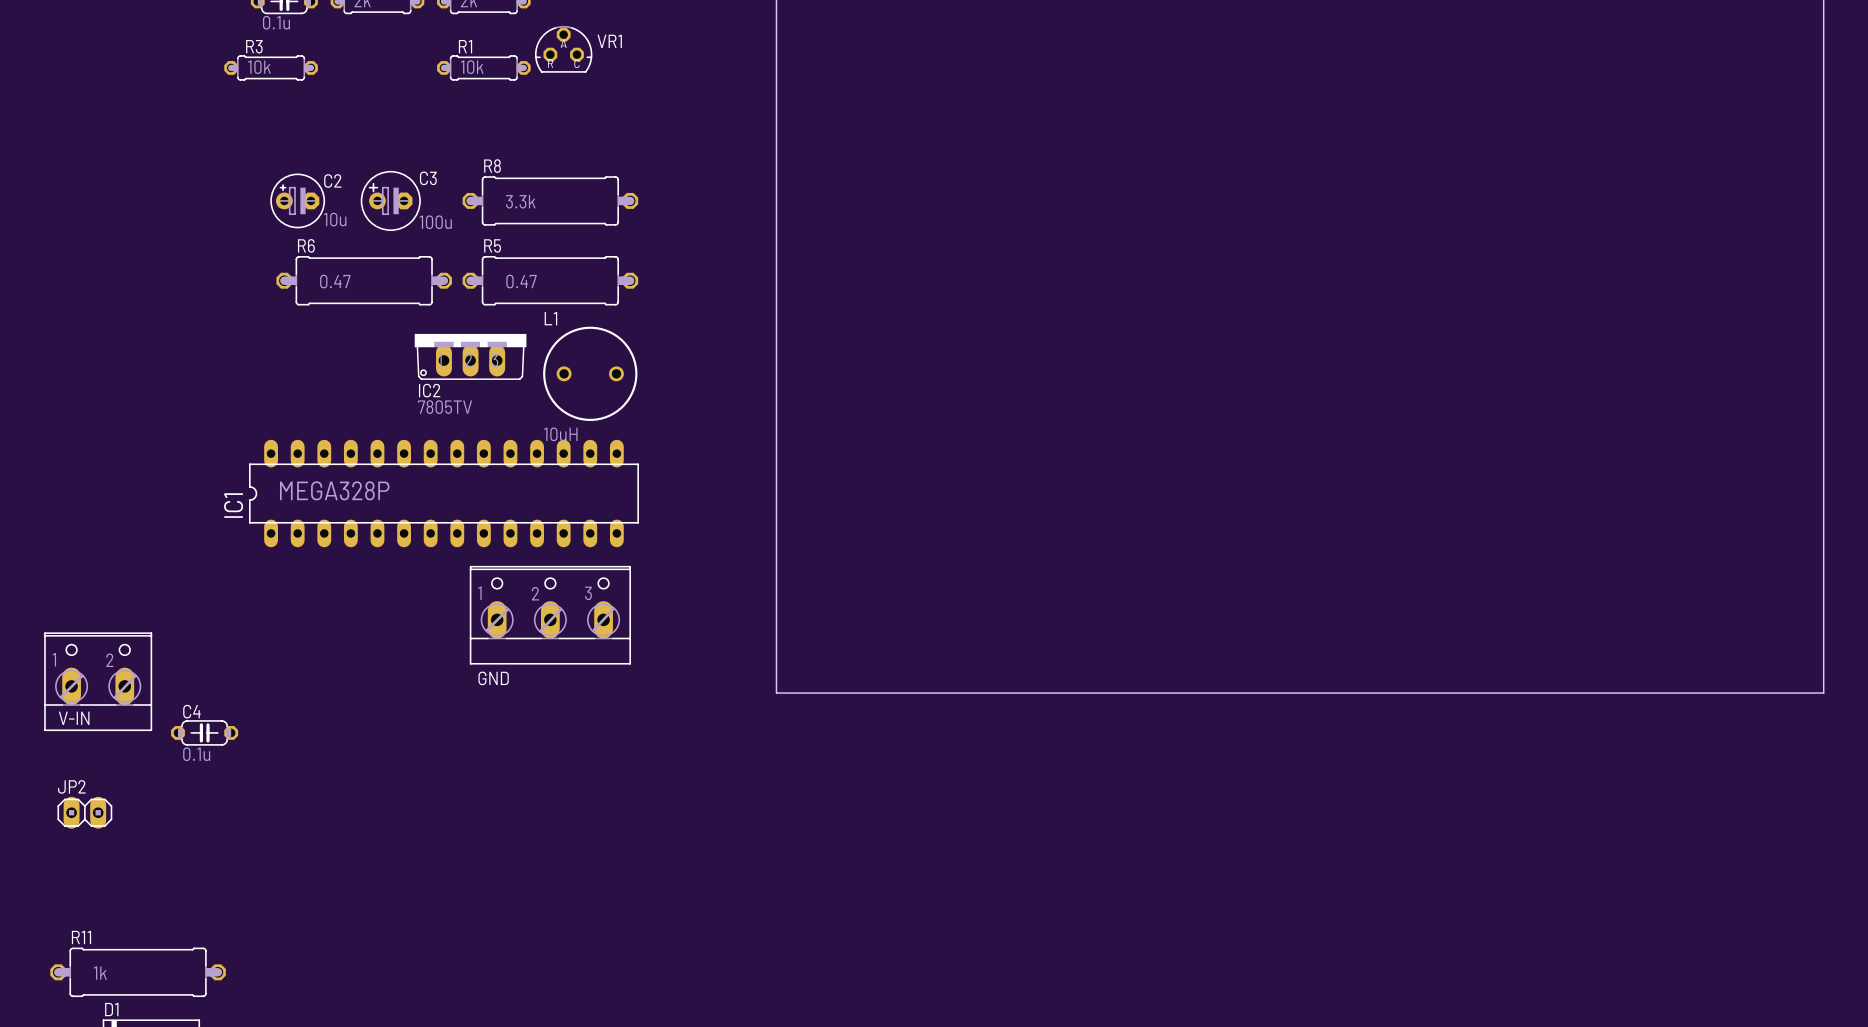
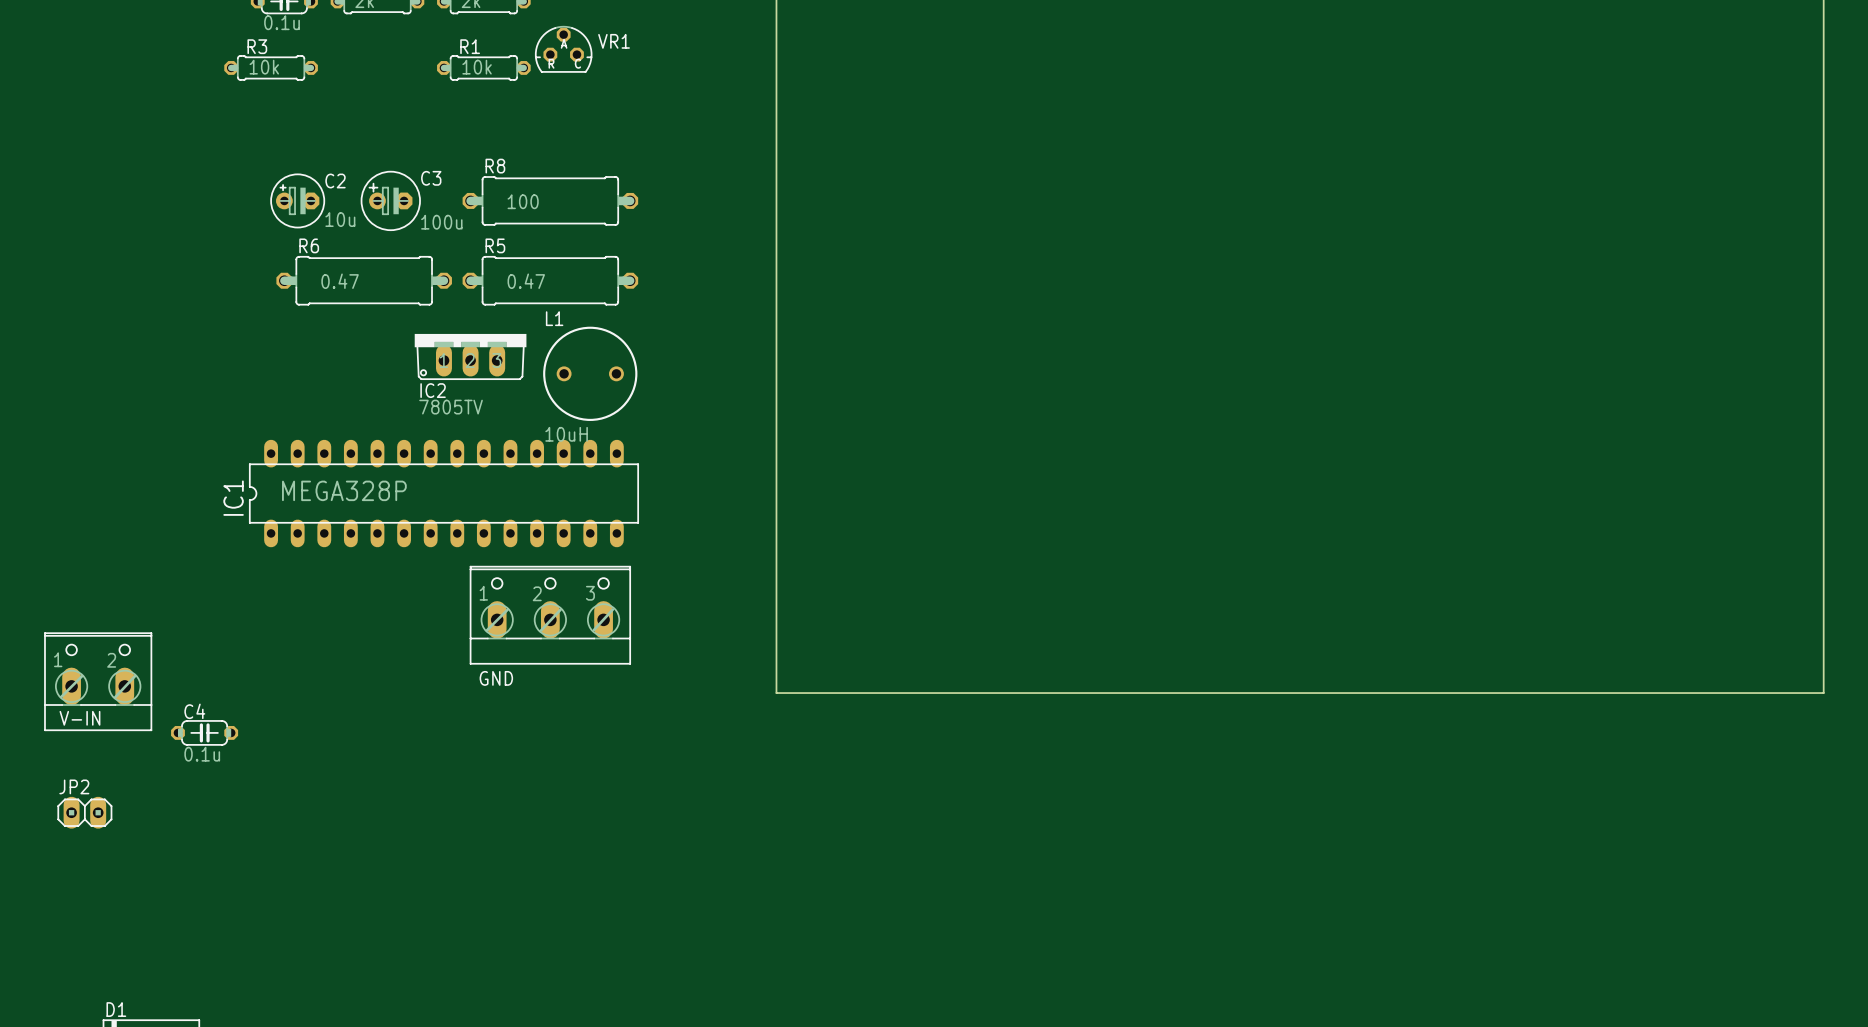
R8 value: 3.3k (520, 201) -> 100 (523, 201)
R11: 1k (138, 972) -> none

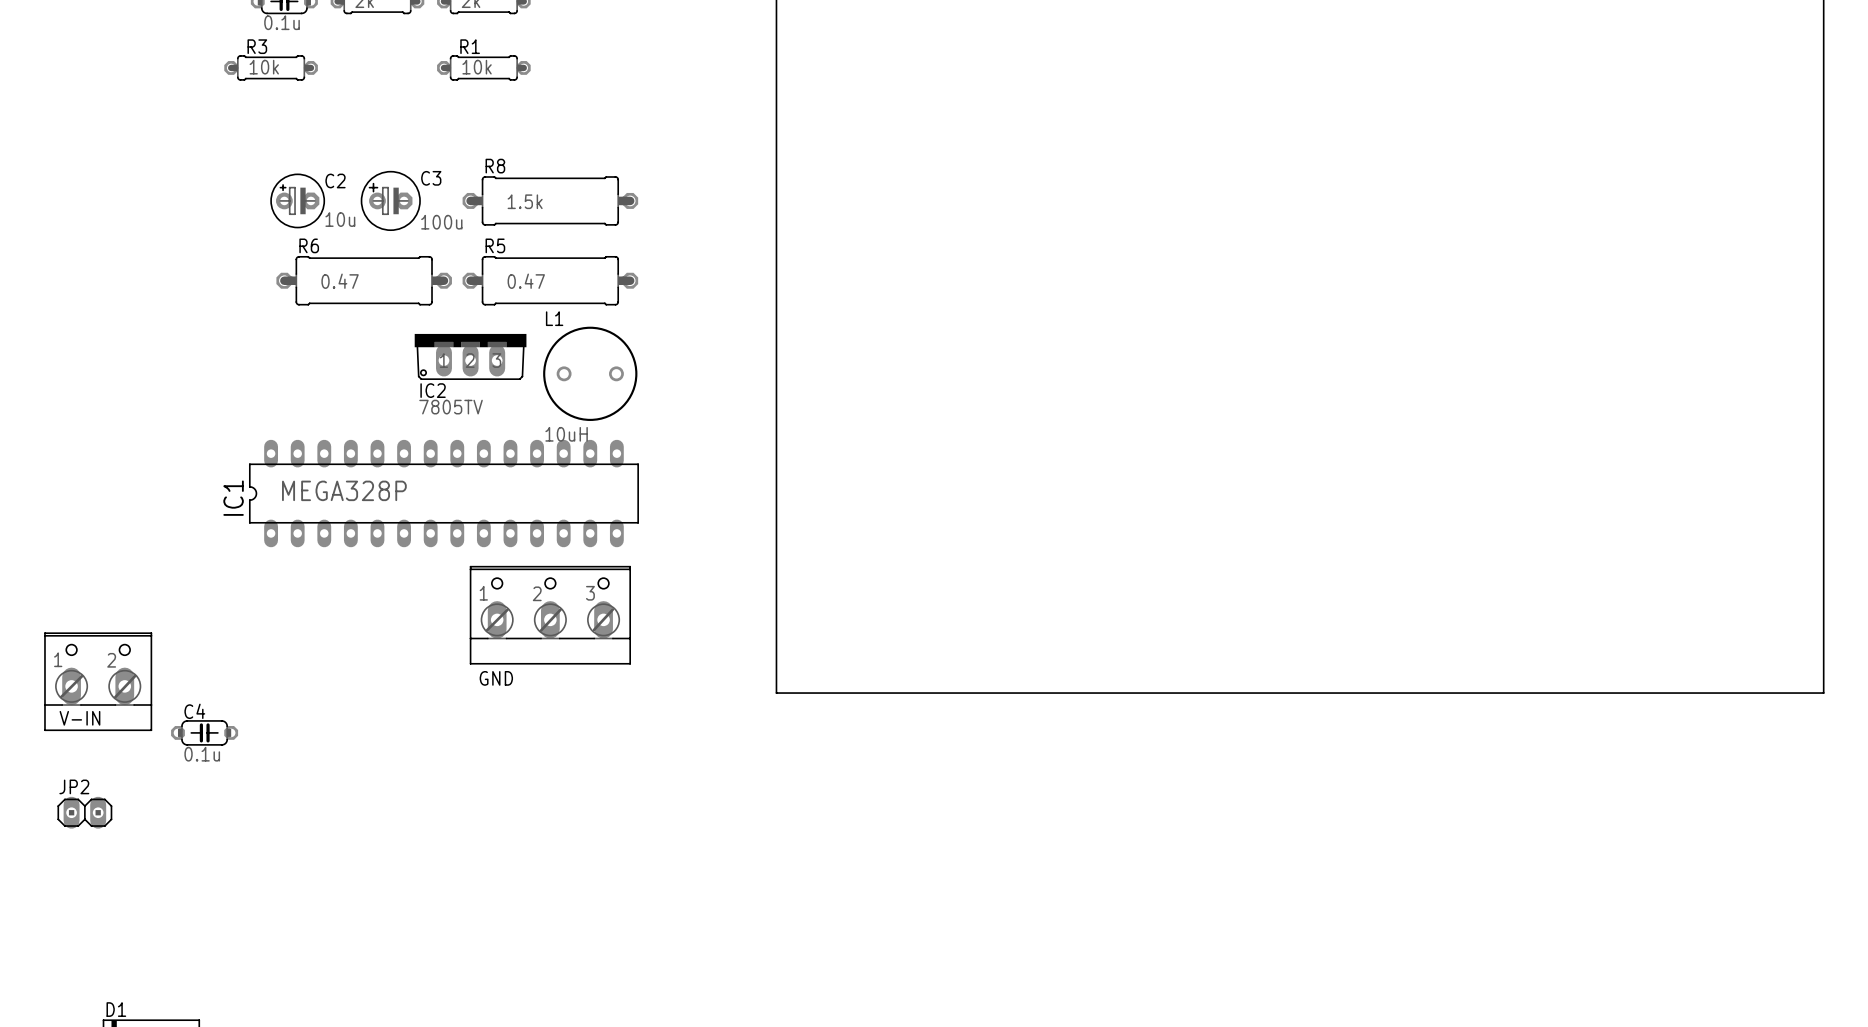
VR1: (563, 49) -> none
R8 value: 100 (523, 201) -> 1.5k (525, 201)

